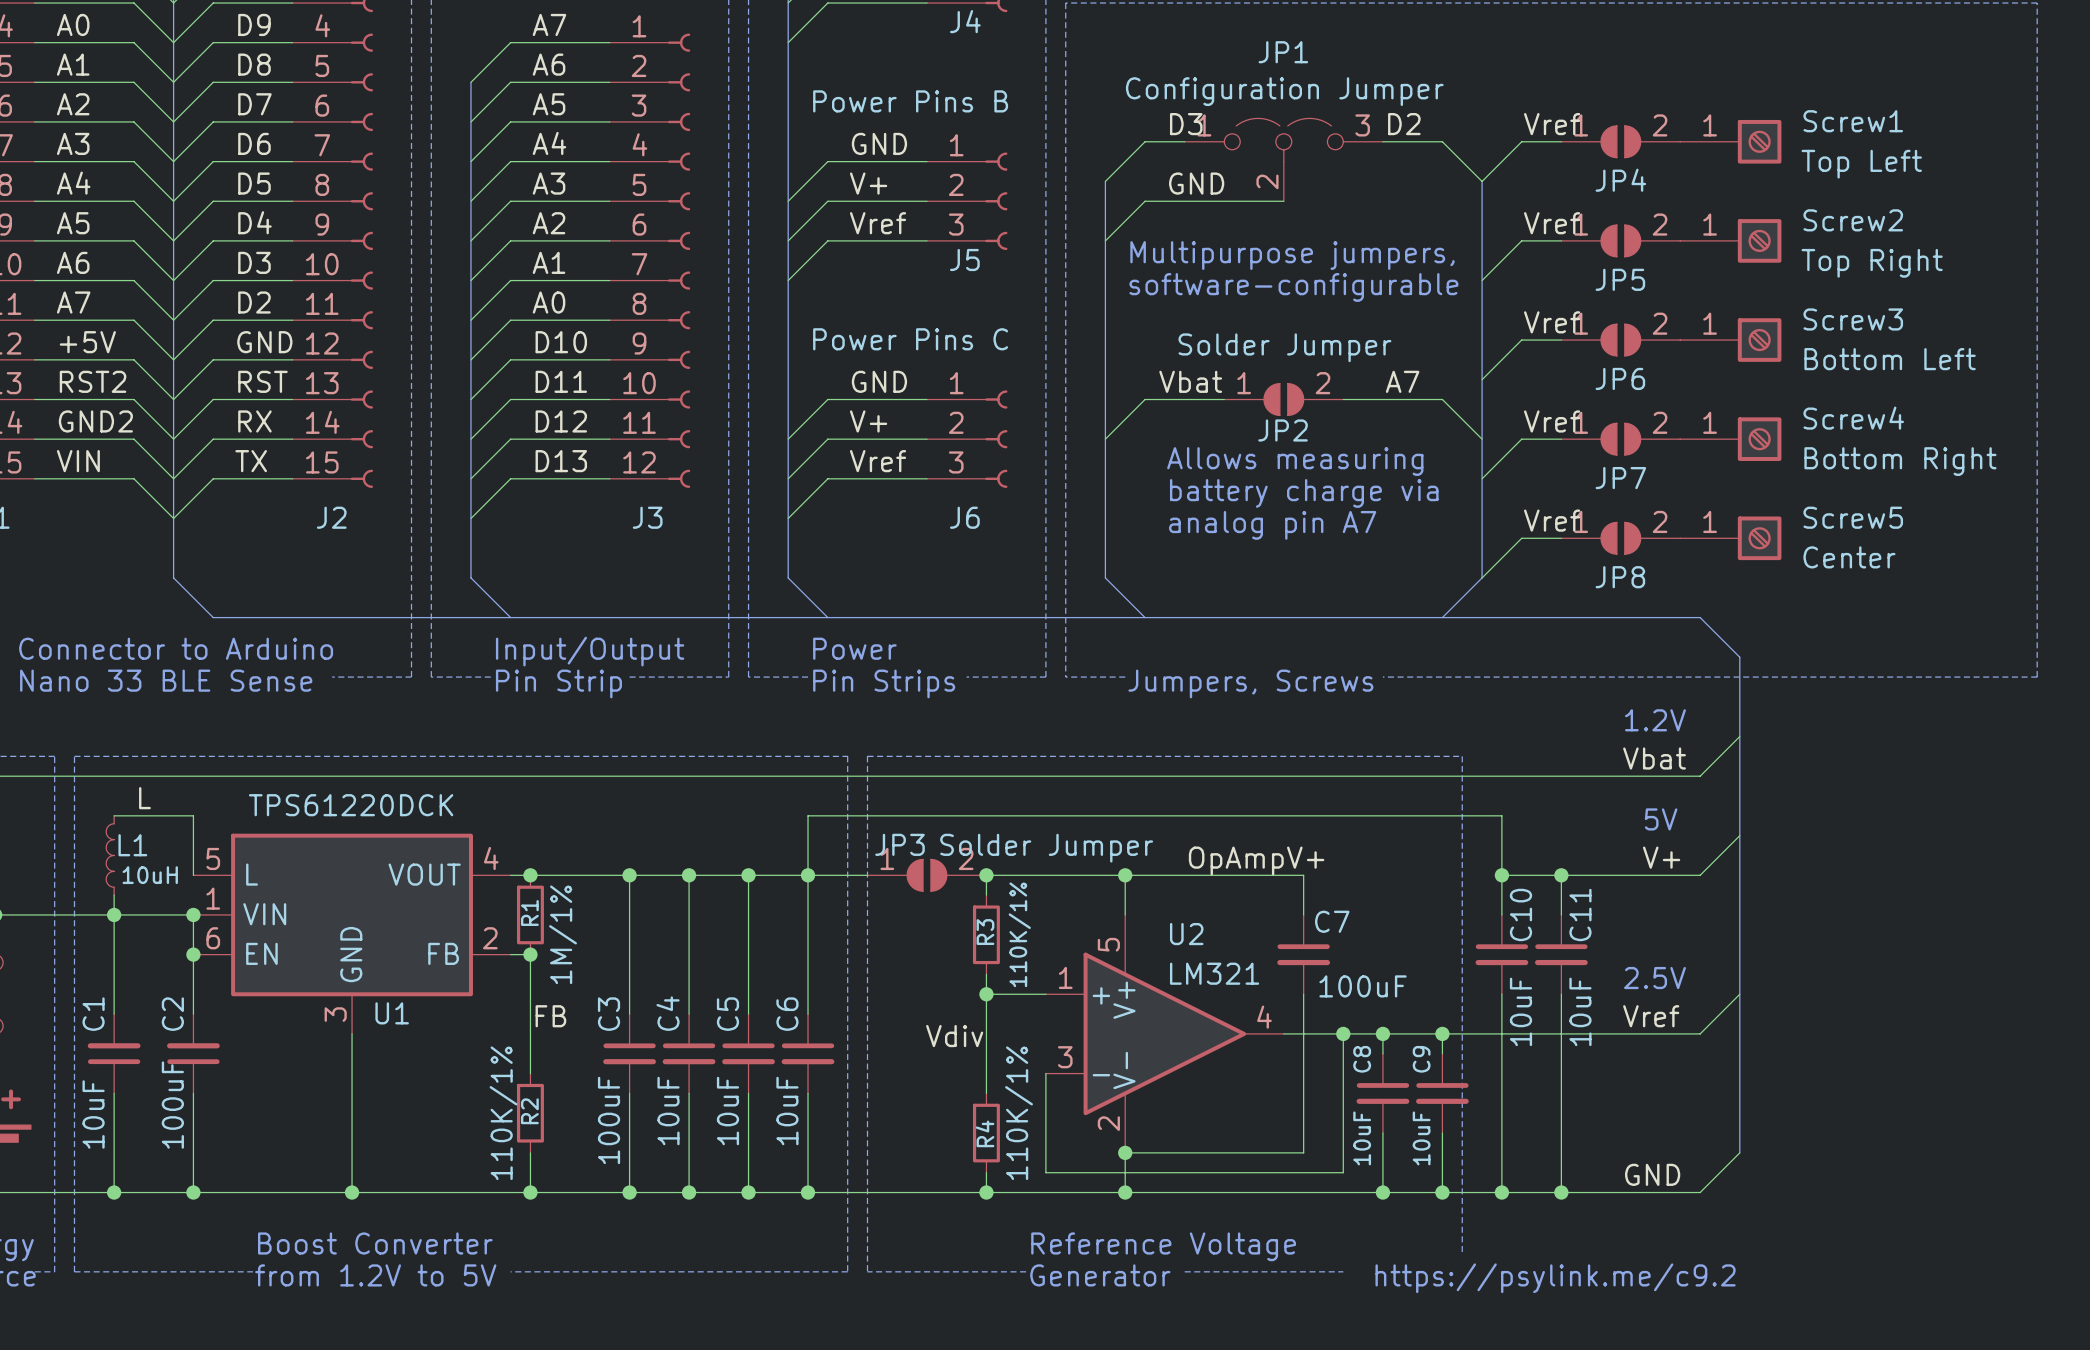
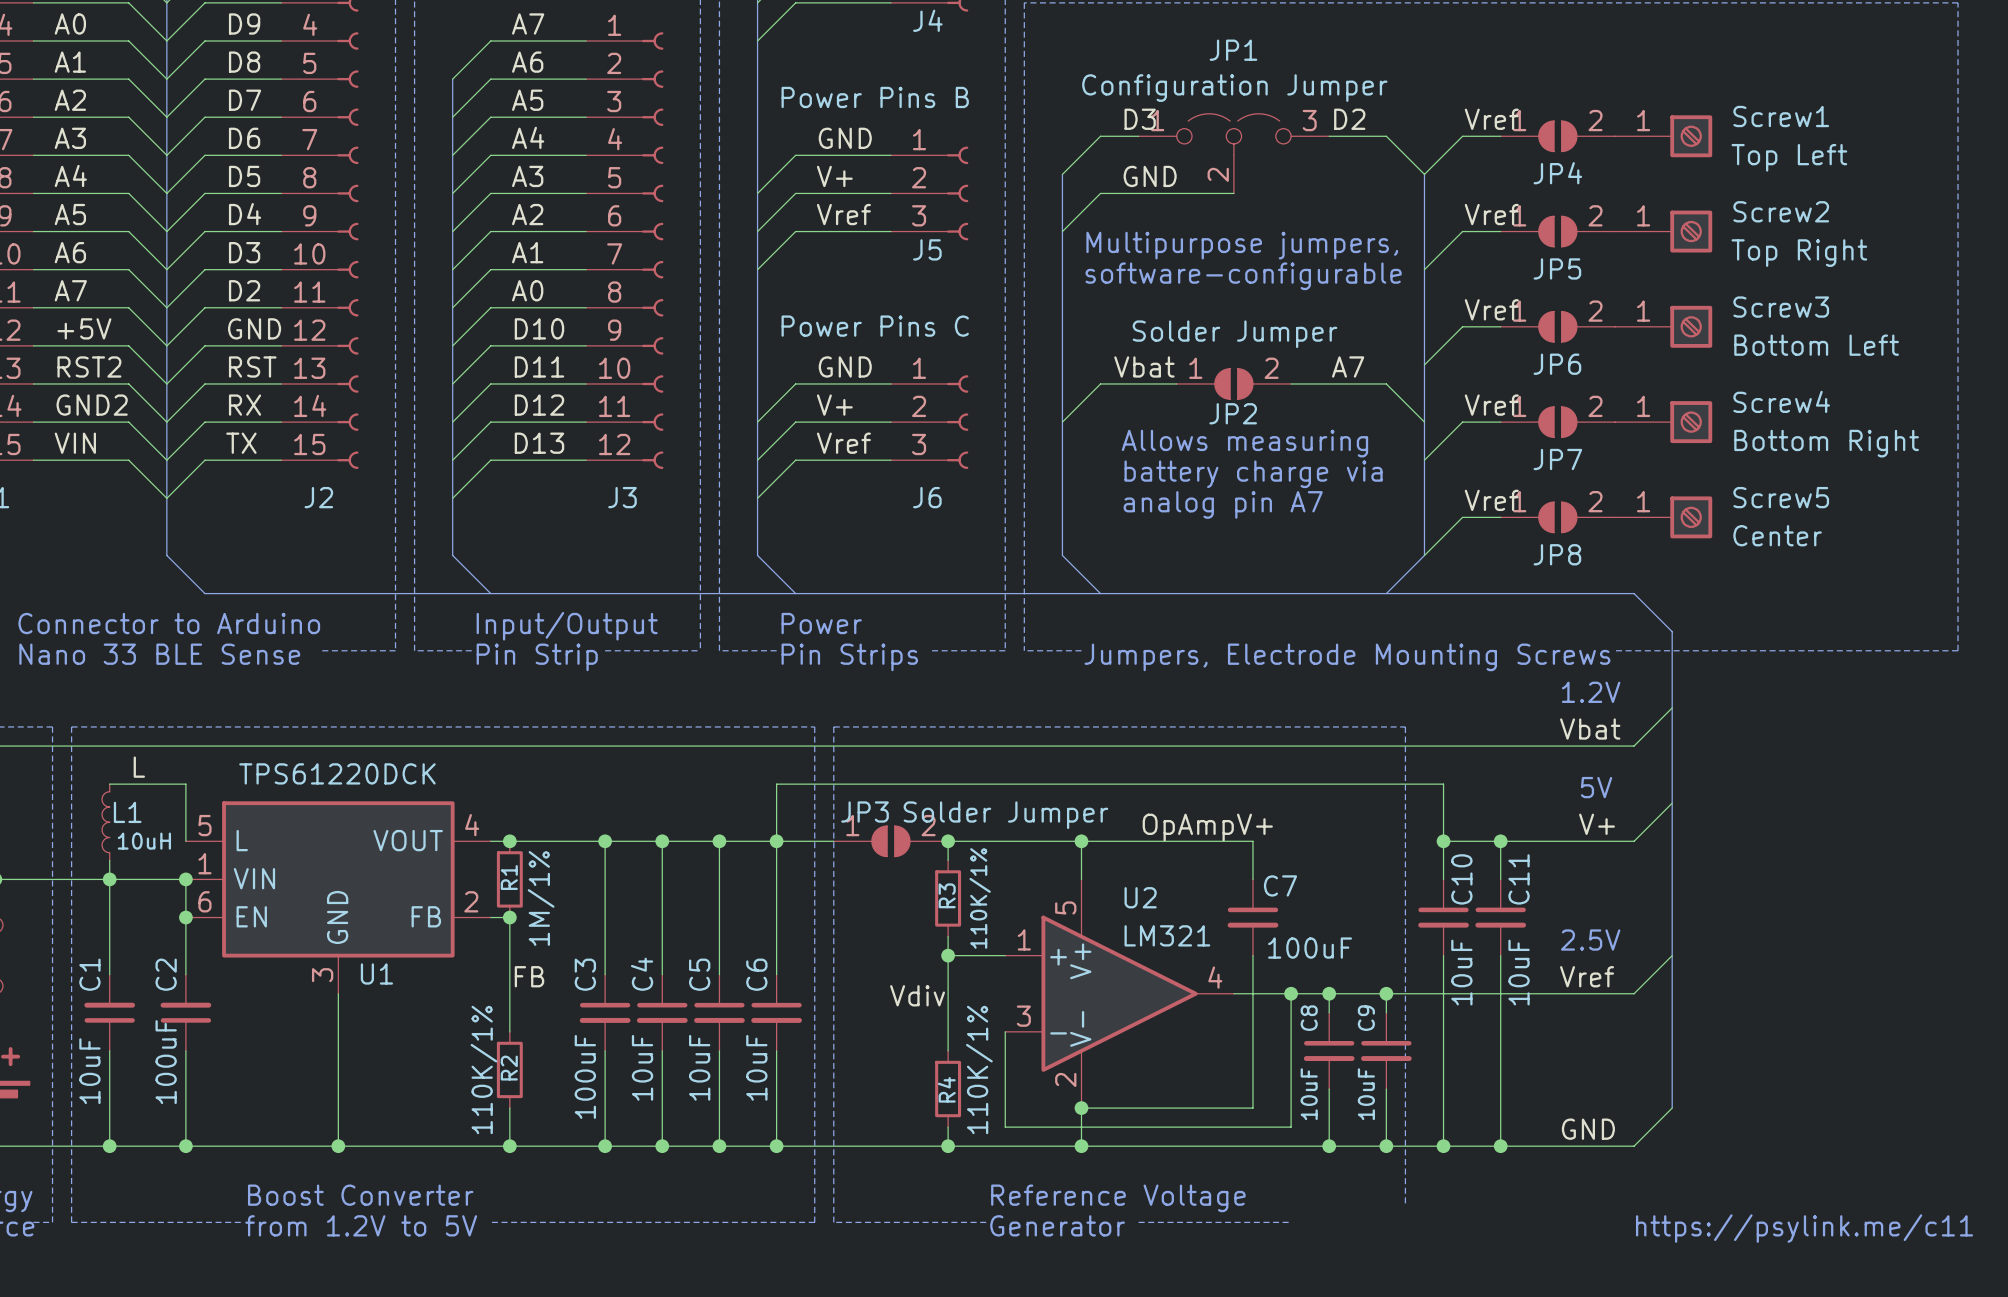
line: (1382, 677) (1680, 677) -> none
text: Jumpers, Screws (1250, 683) -> Jumpers, Electrode Mounting Screws (1347, 657)
text: https://psylink.me/c9.2 (1555, 1278) -> https://psylink.me/c11 (1804, 1228)

